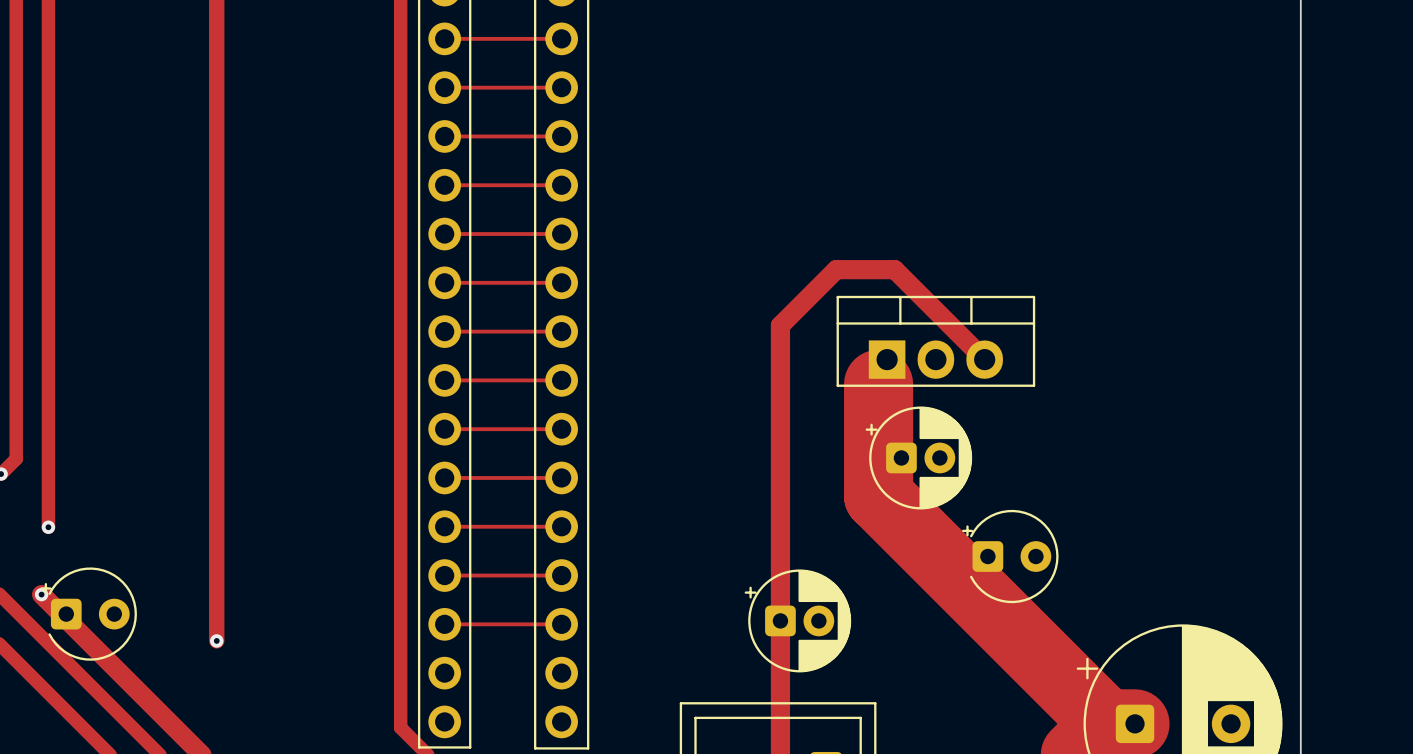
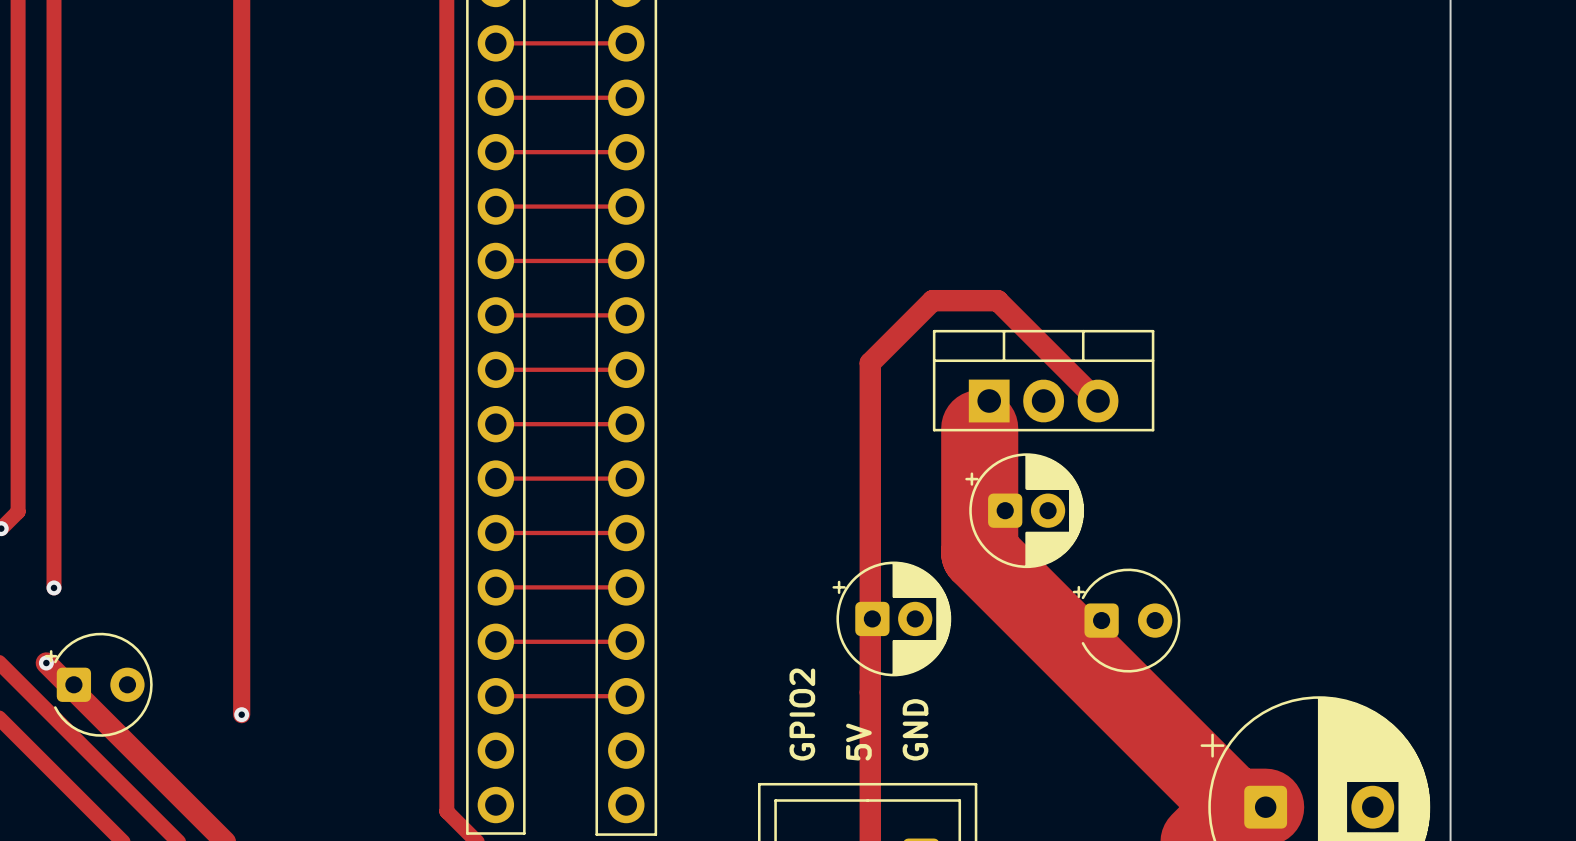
part position: (797, 620) -> (891, 618)
text: none -> GPIO2 (802, 714)
text: none -> GND (915, 729)
text: none -> 5V (858, 742)

